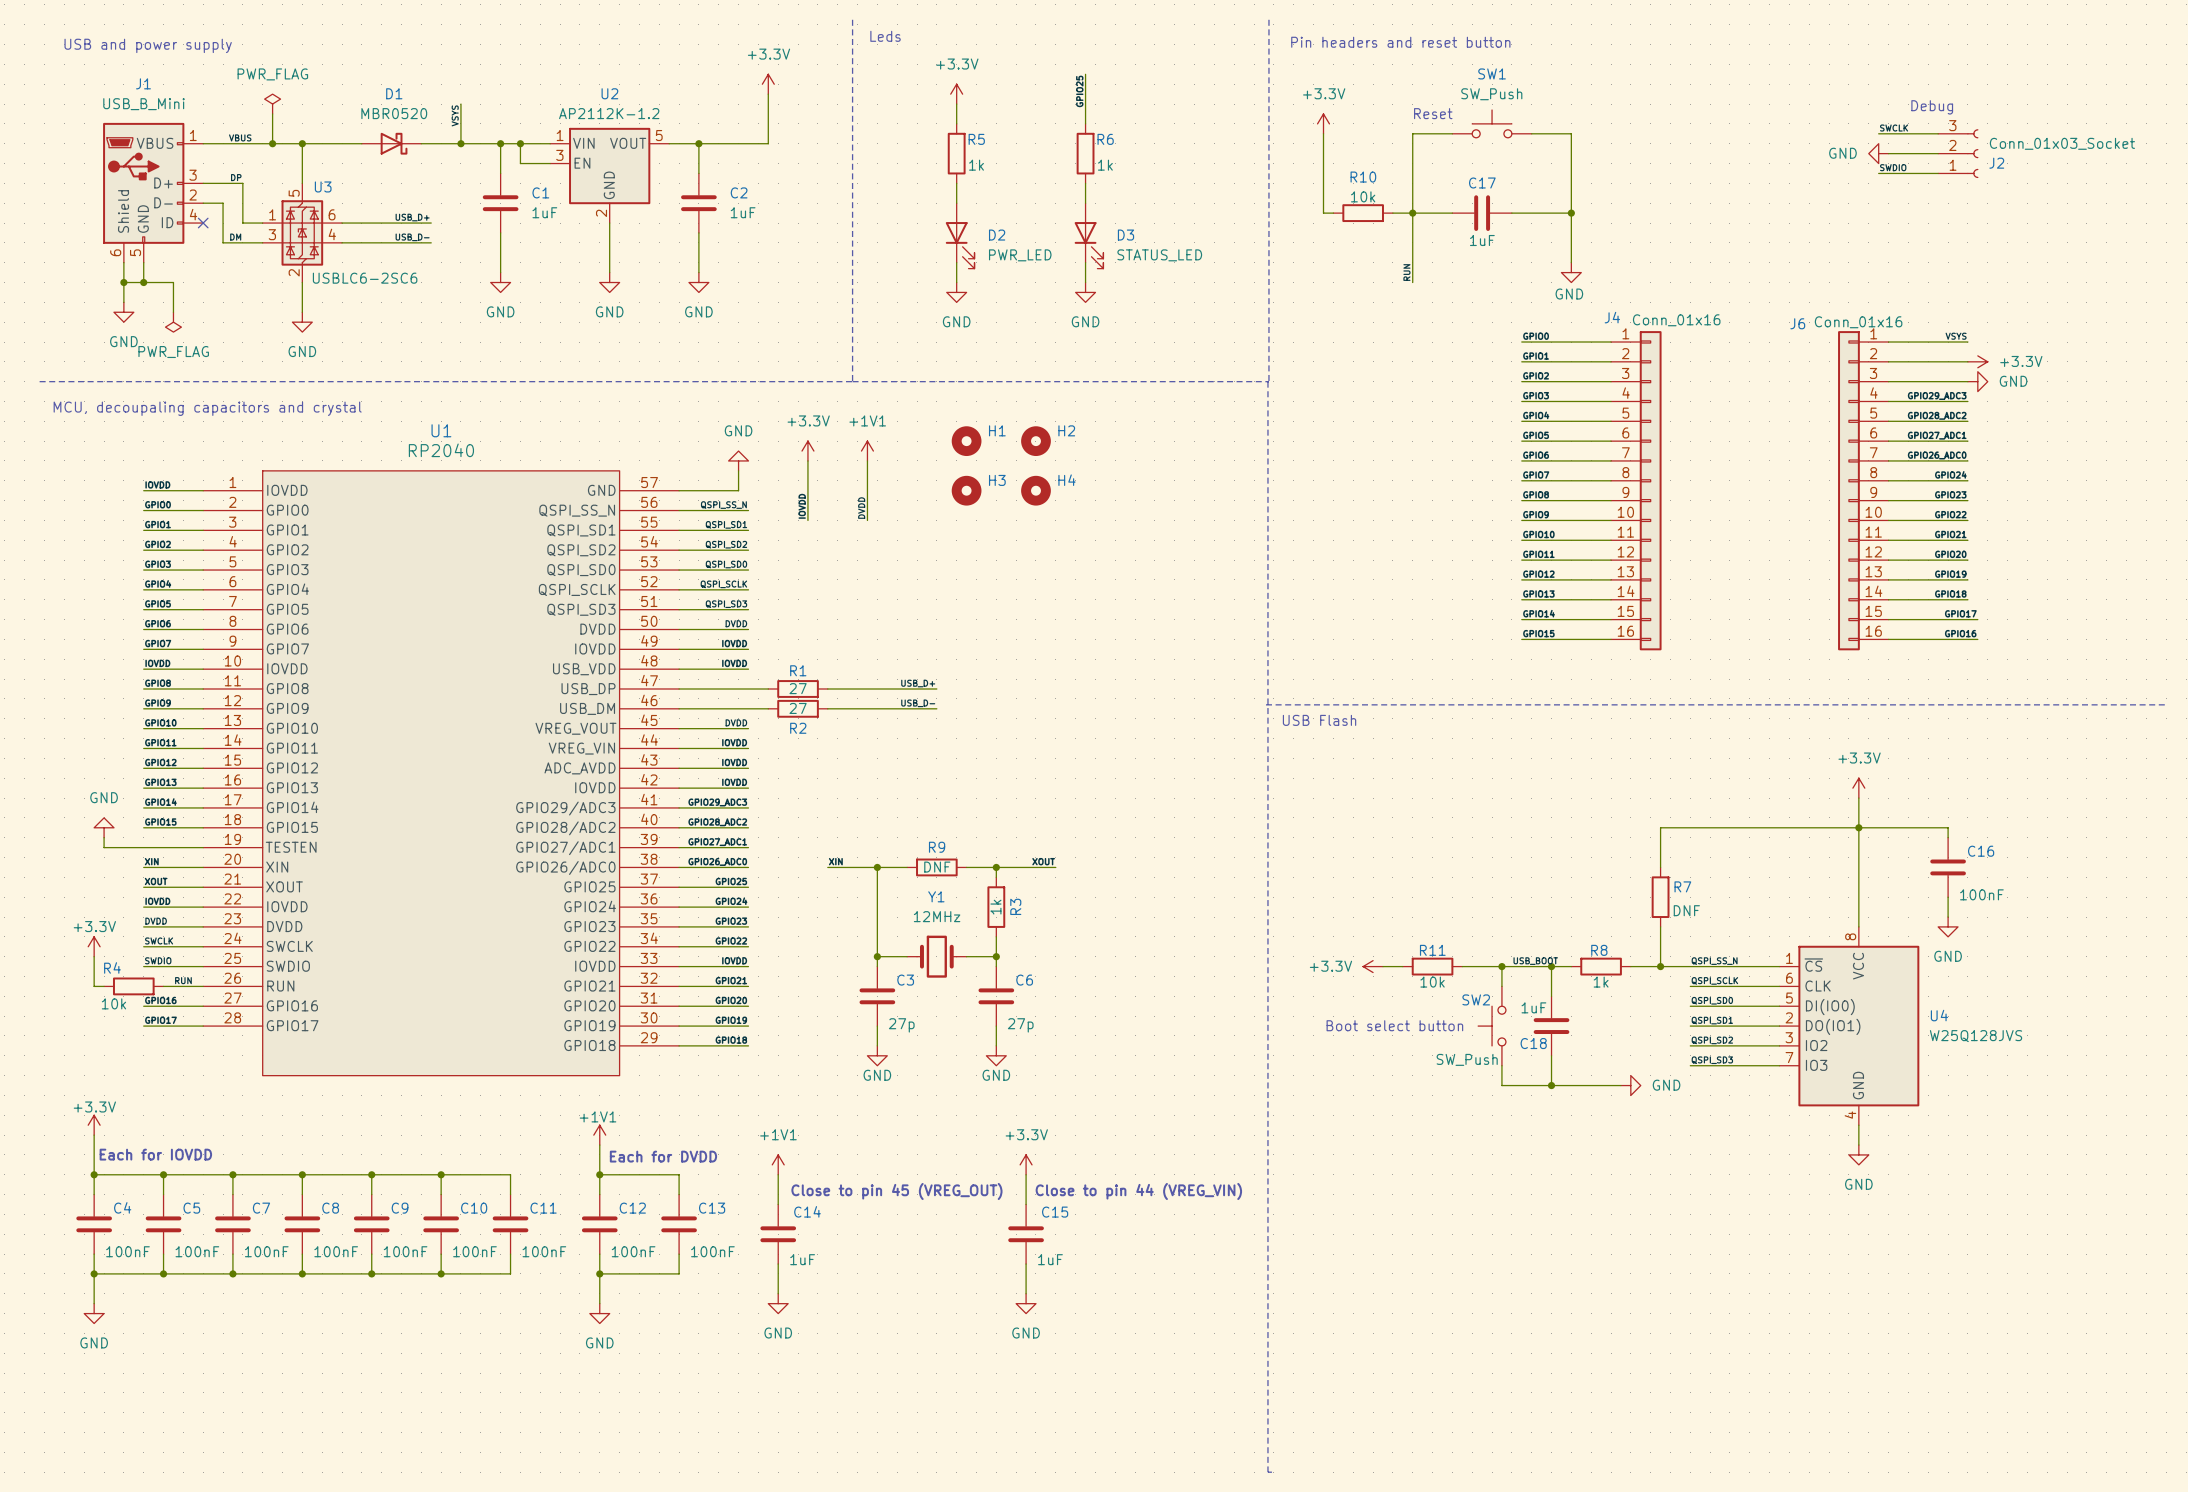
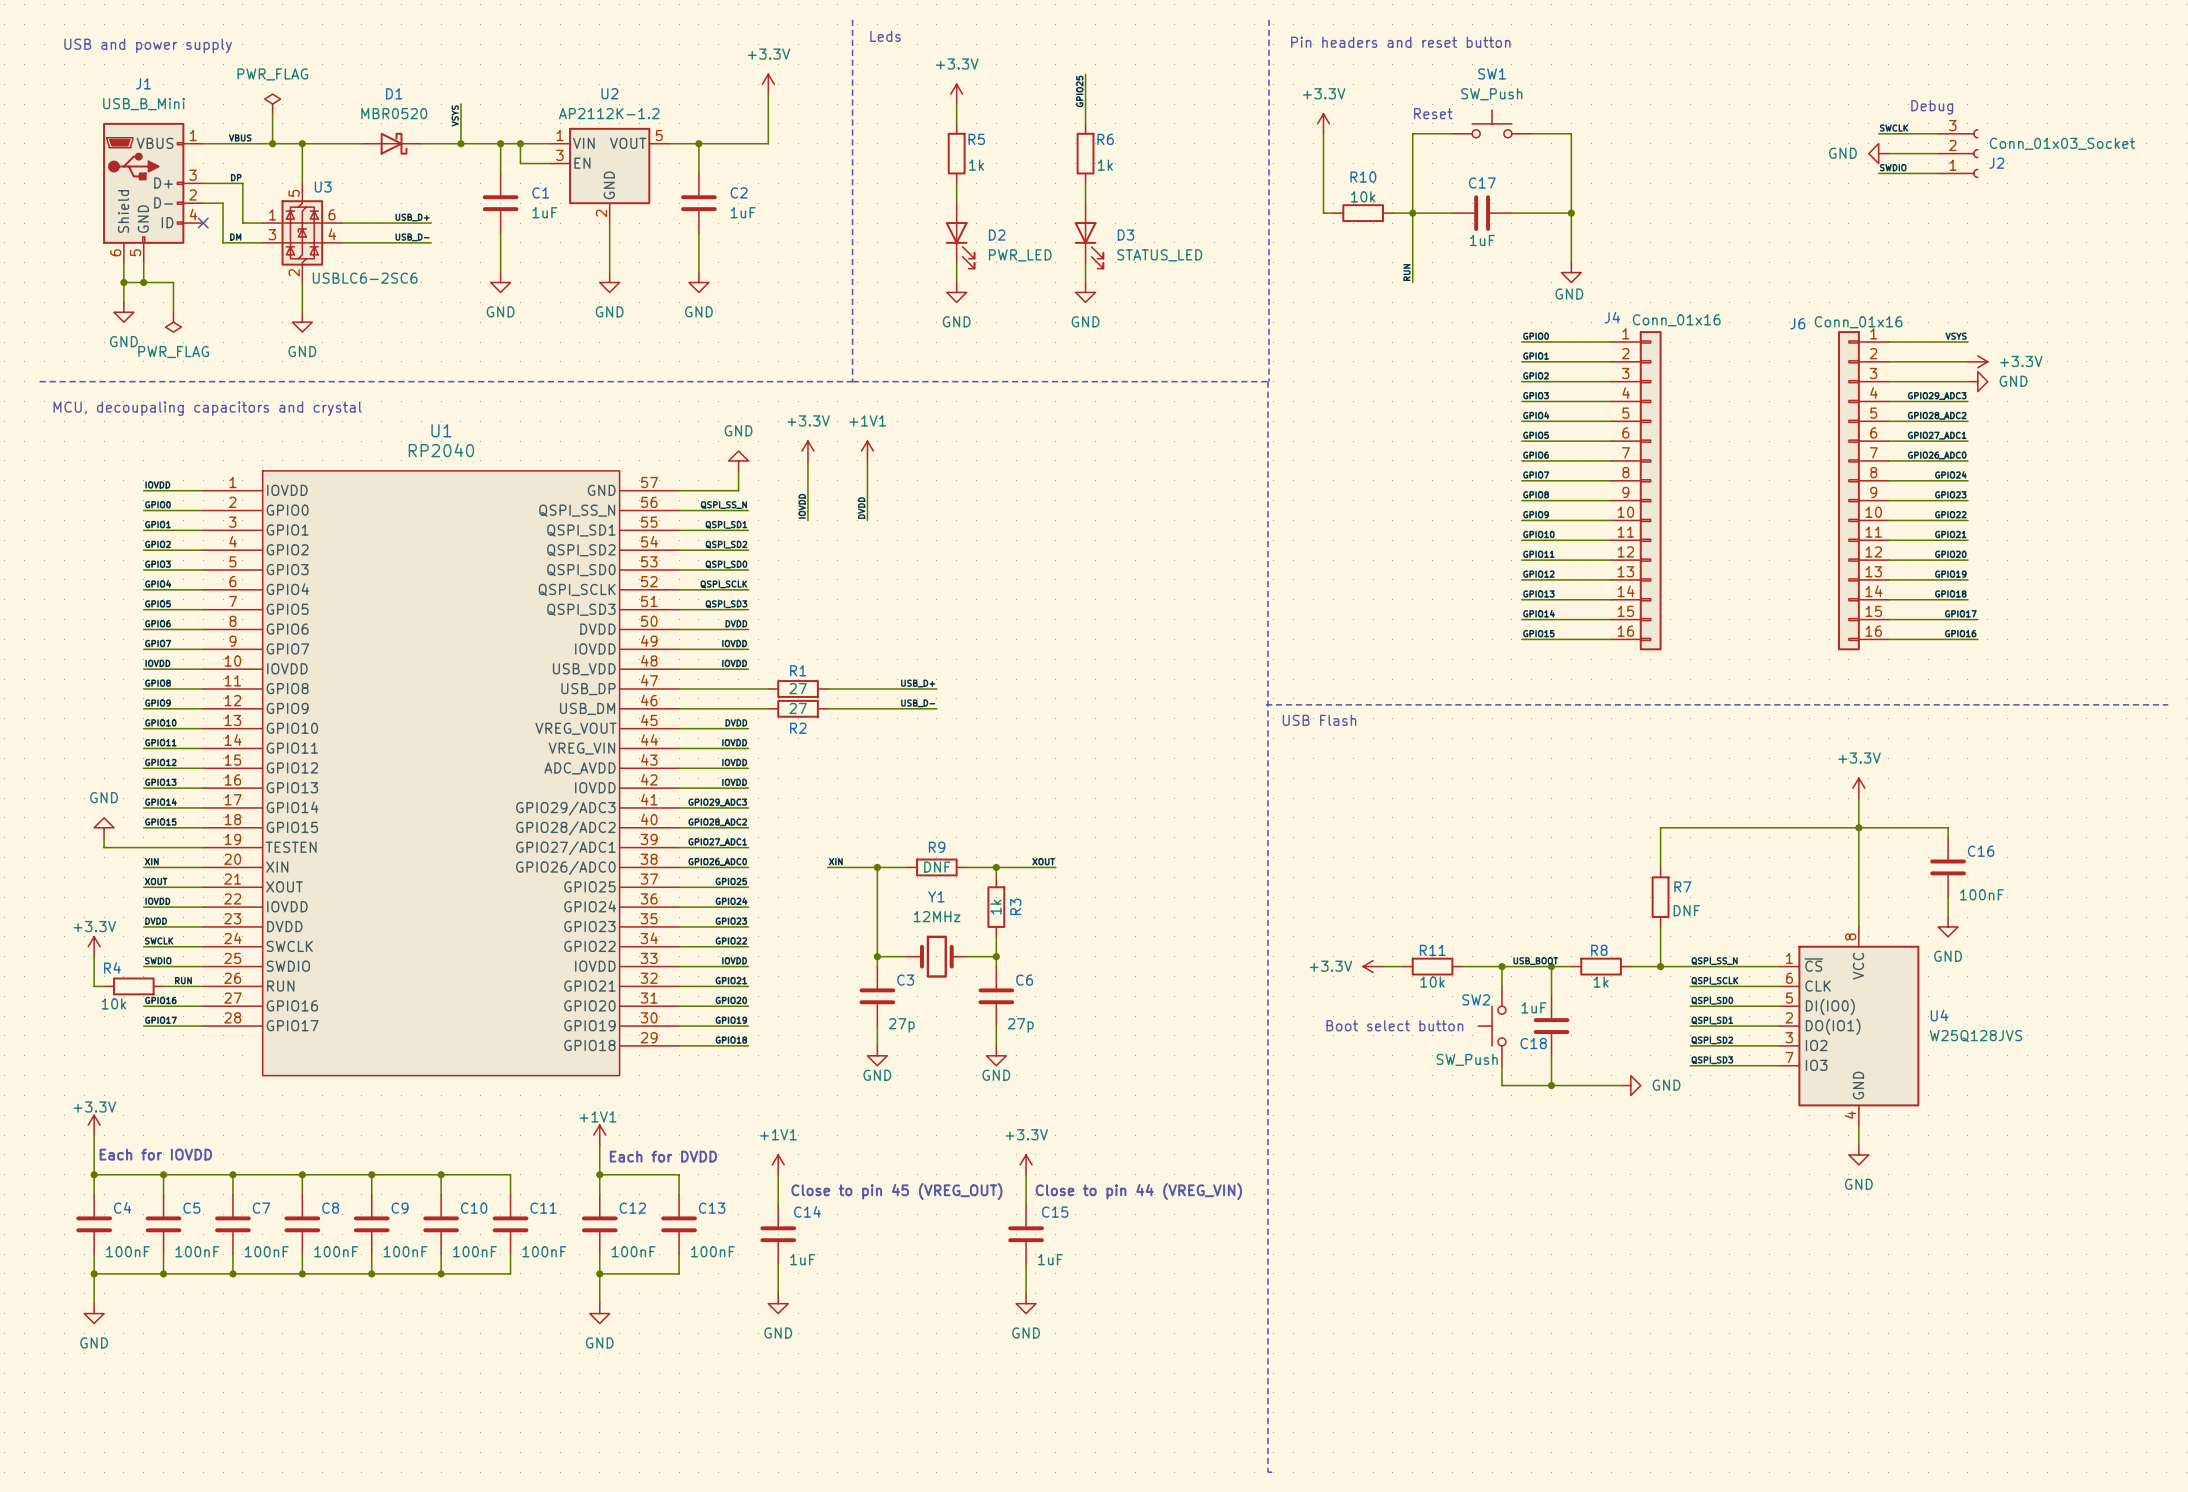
H1: (966, 441) -> none
H2: (1035, 441) -> none
H3: (966, 490) -> none
H4: (1035, 490) -> none

